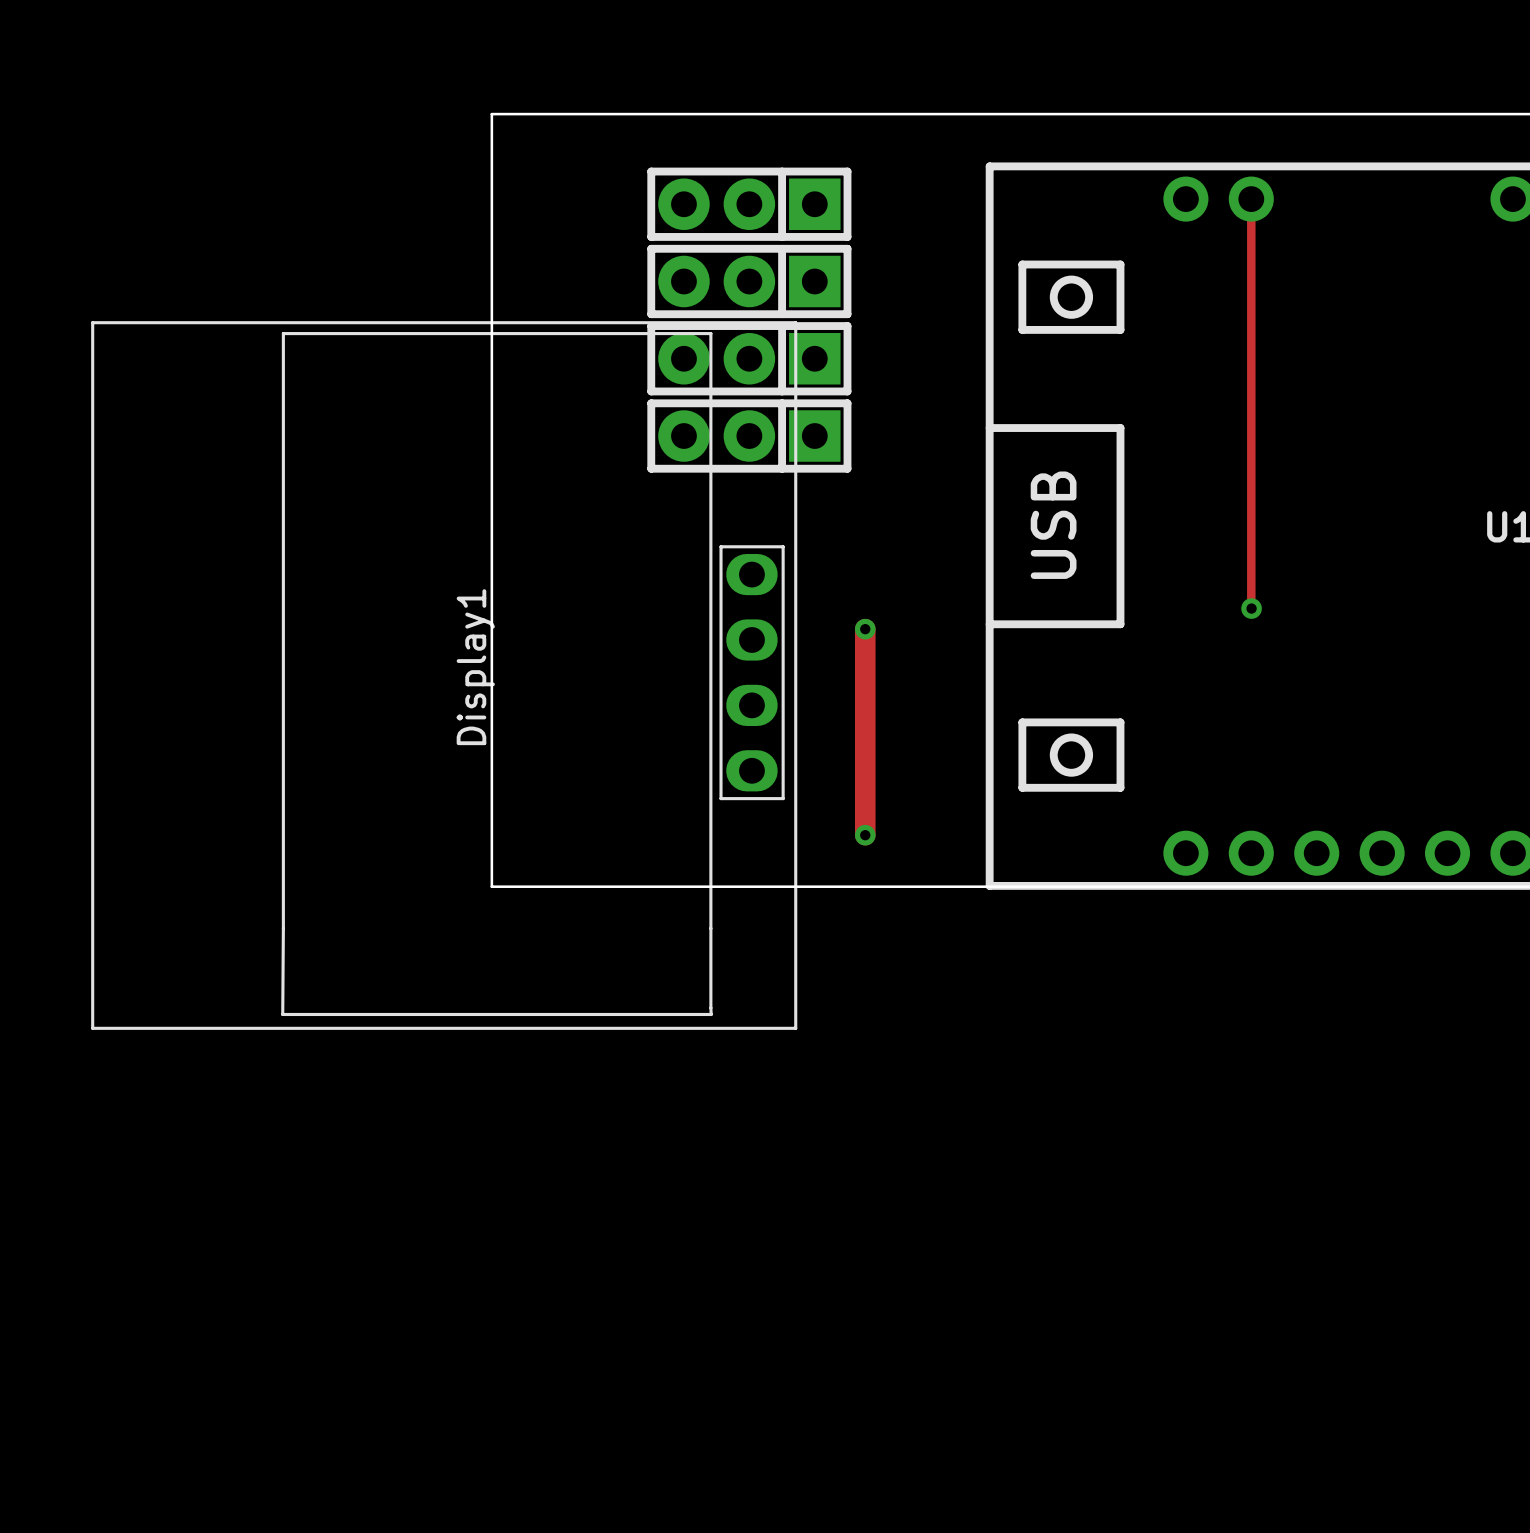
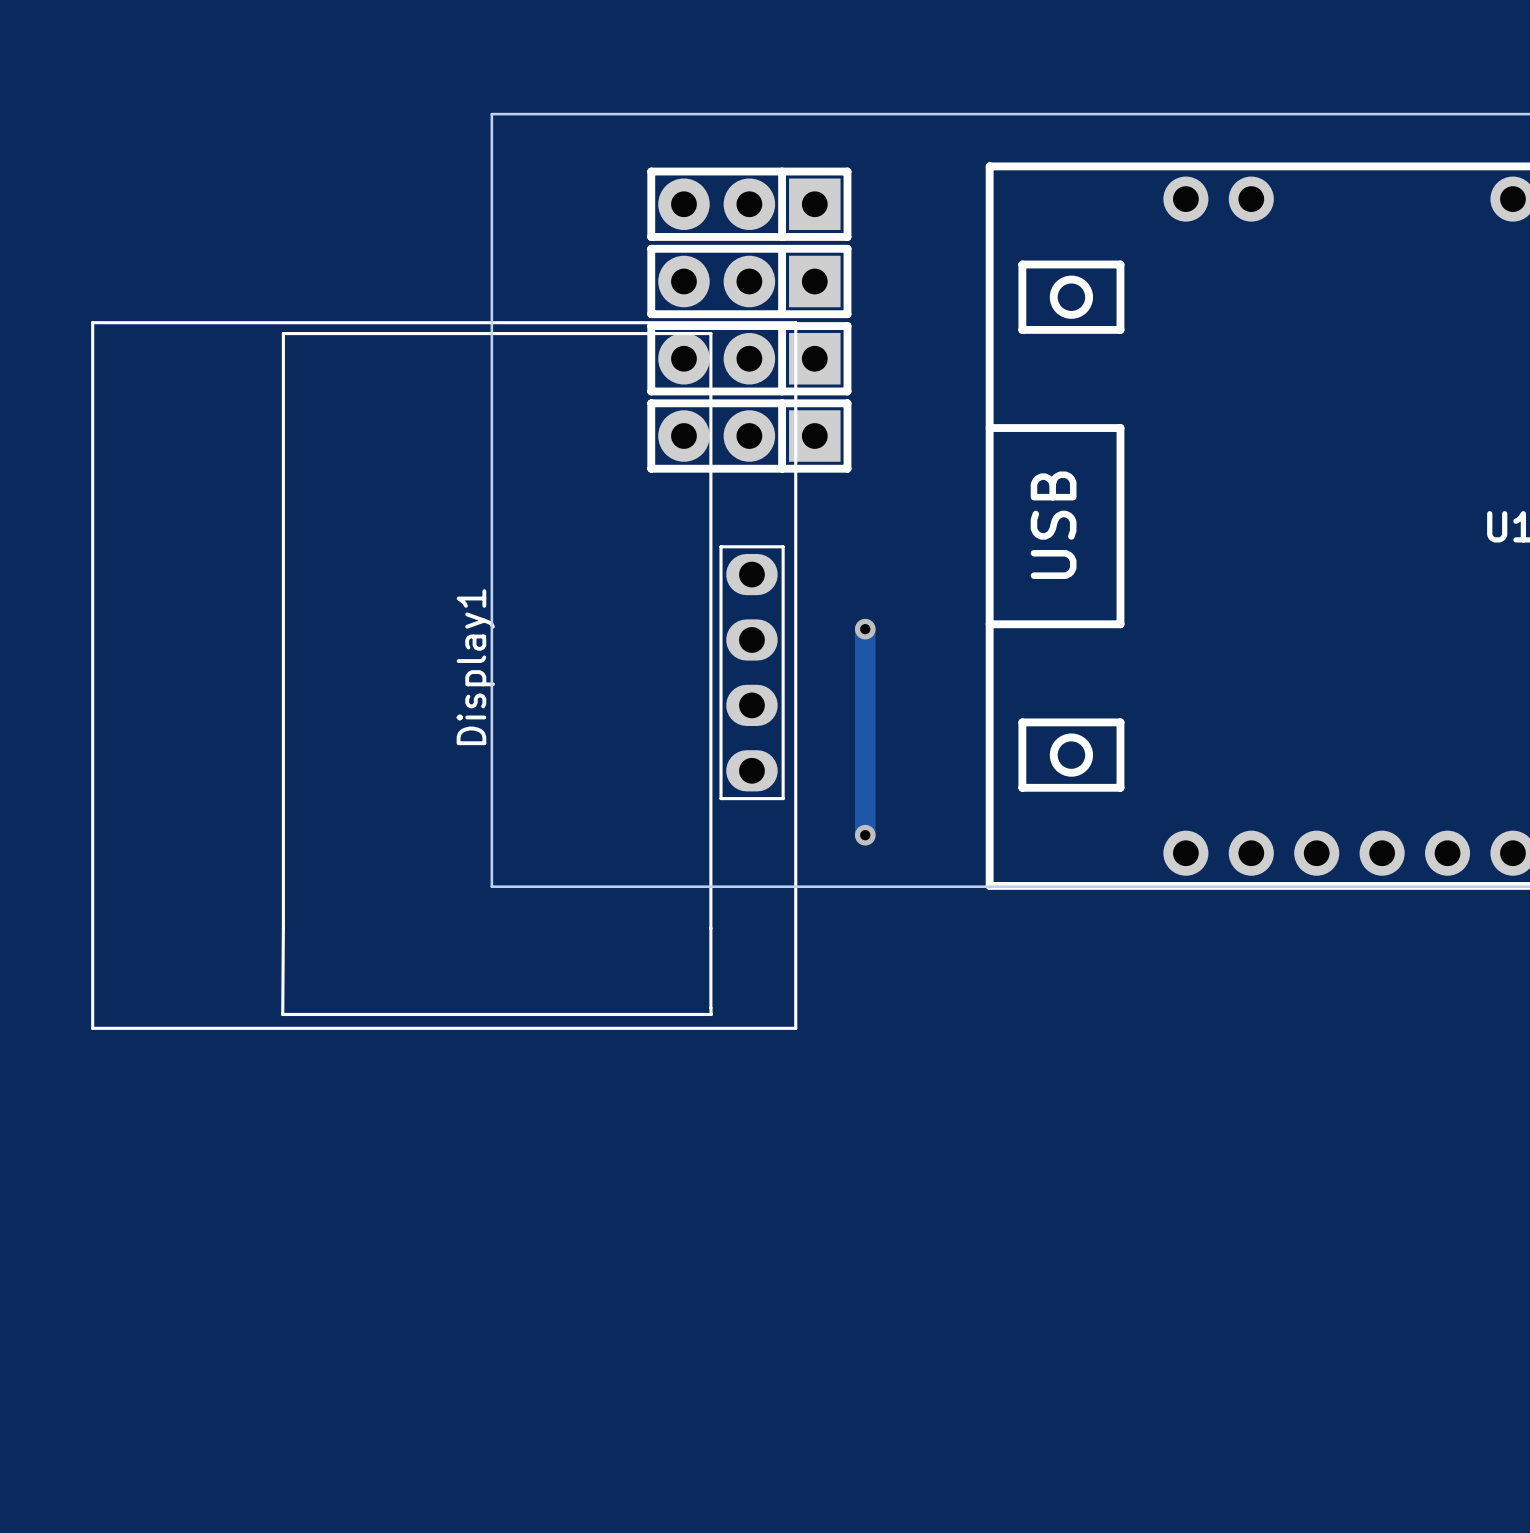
track: (1251, 199) (1251, 608) -> none
via: (1251, 608) -> none

